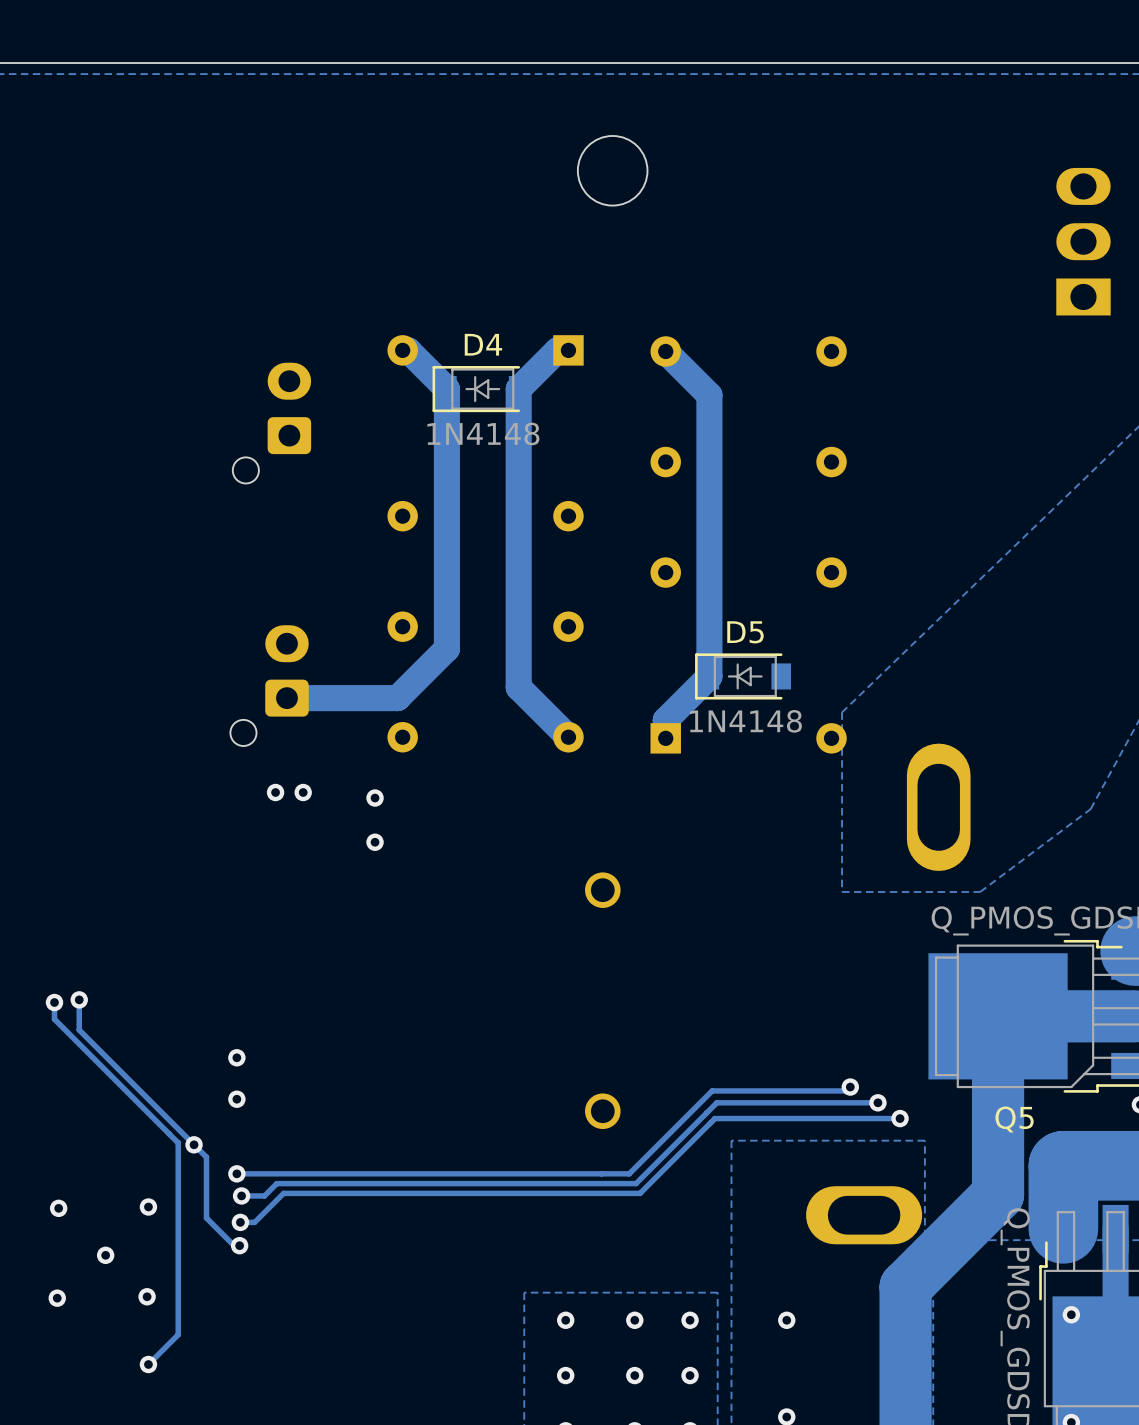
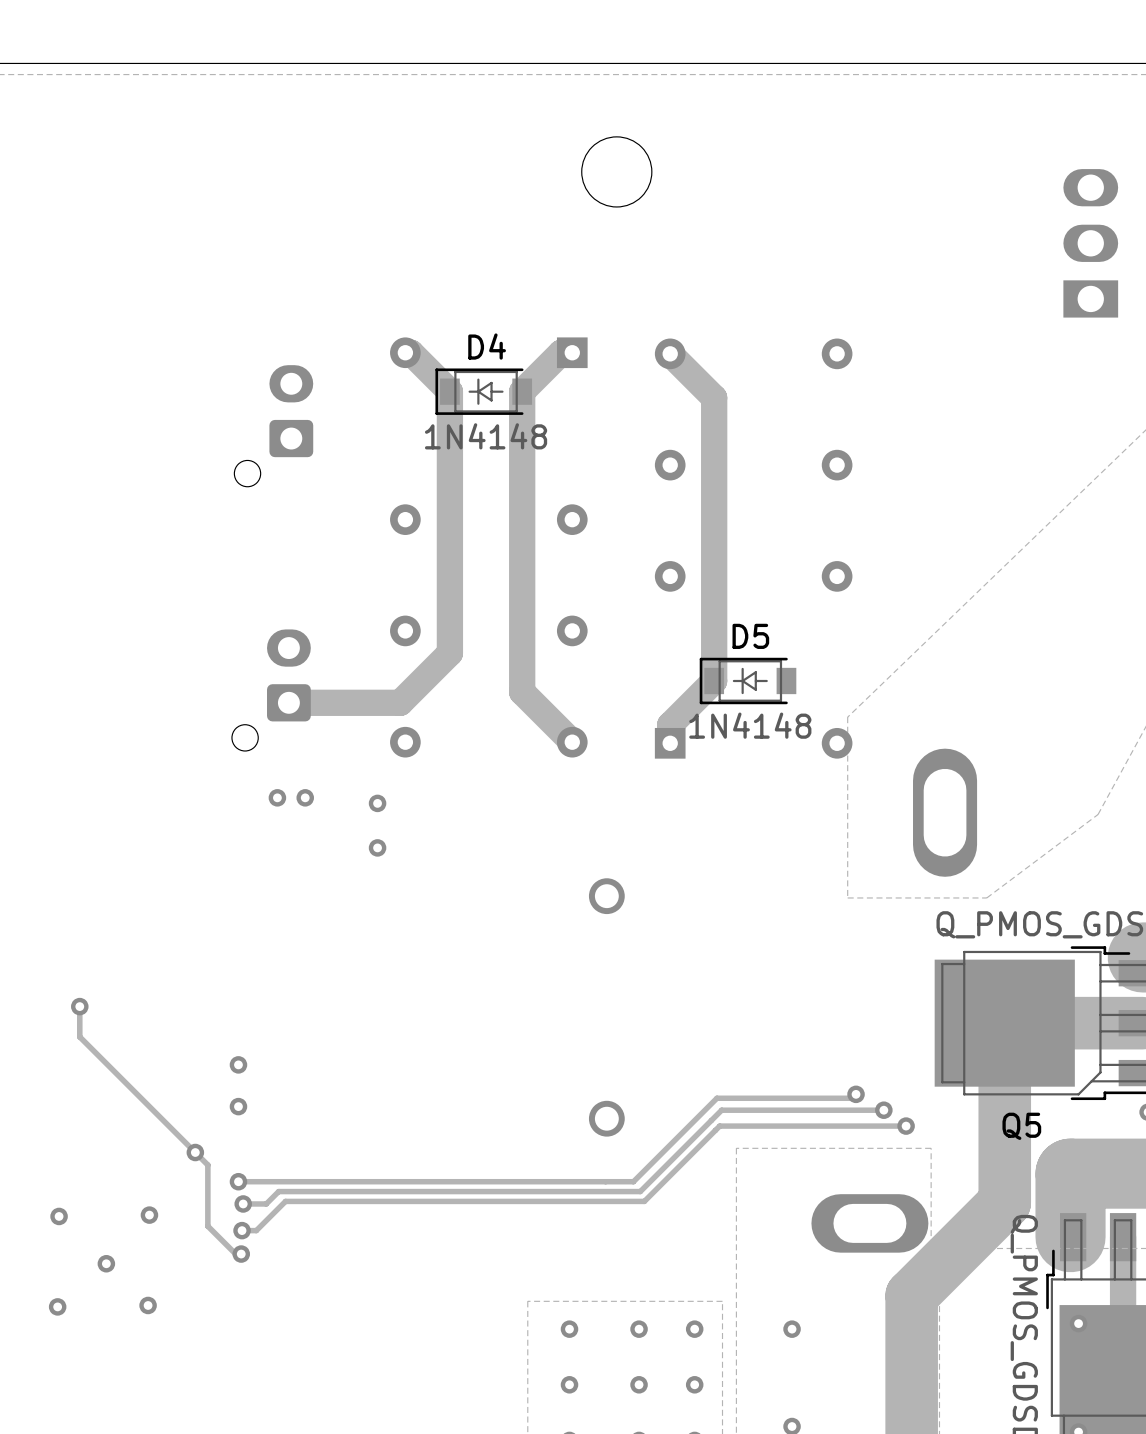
track: (54, 1002) (54, 1019) (178, 1142) (178, 1334) (148, 1364) -> none
via: (54, 1002) -> none
via: (148, 1364) -> none

